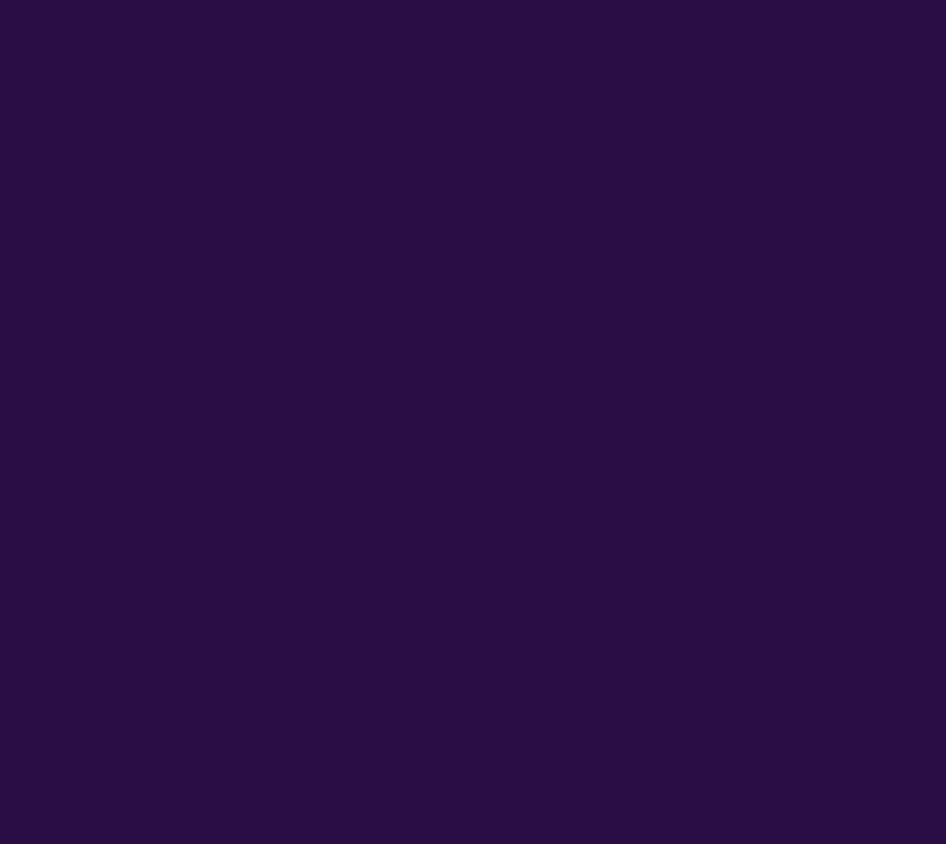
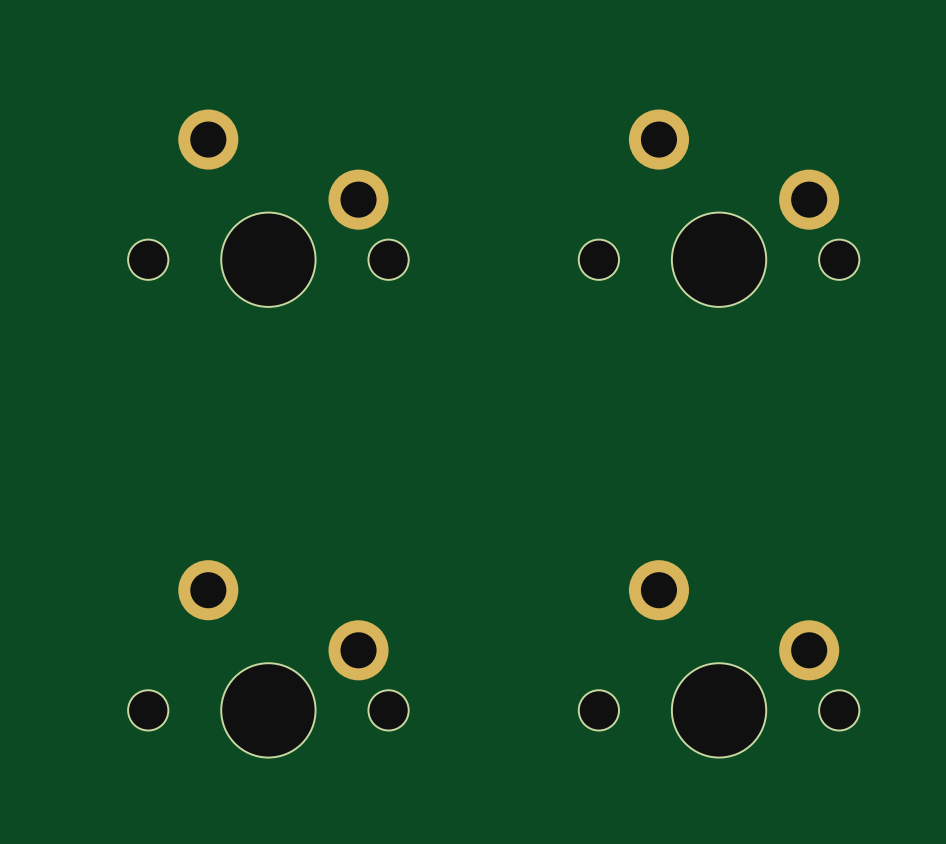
part: none -> (268, 208)
part: none -> (719, 208)
part: none -> (268, 658)
part: none -> (719, 658)

